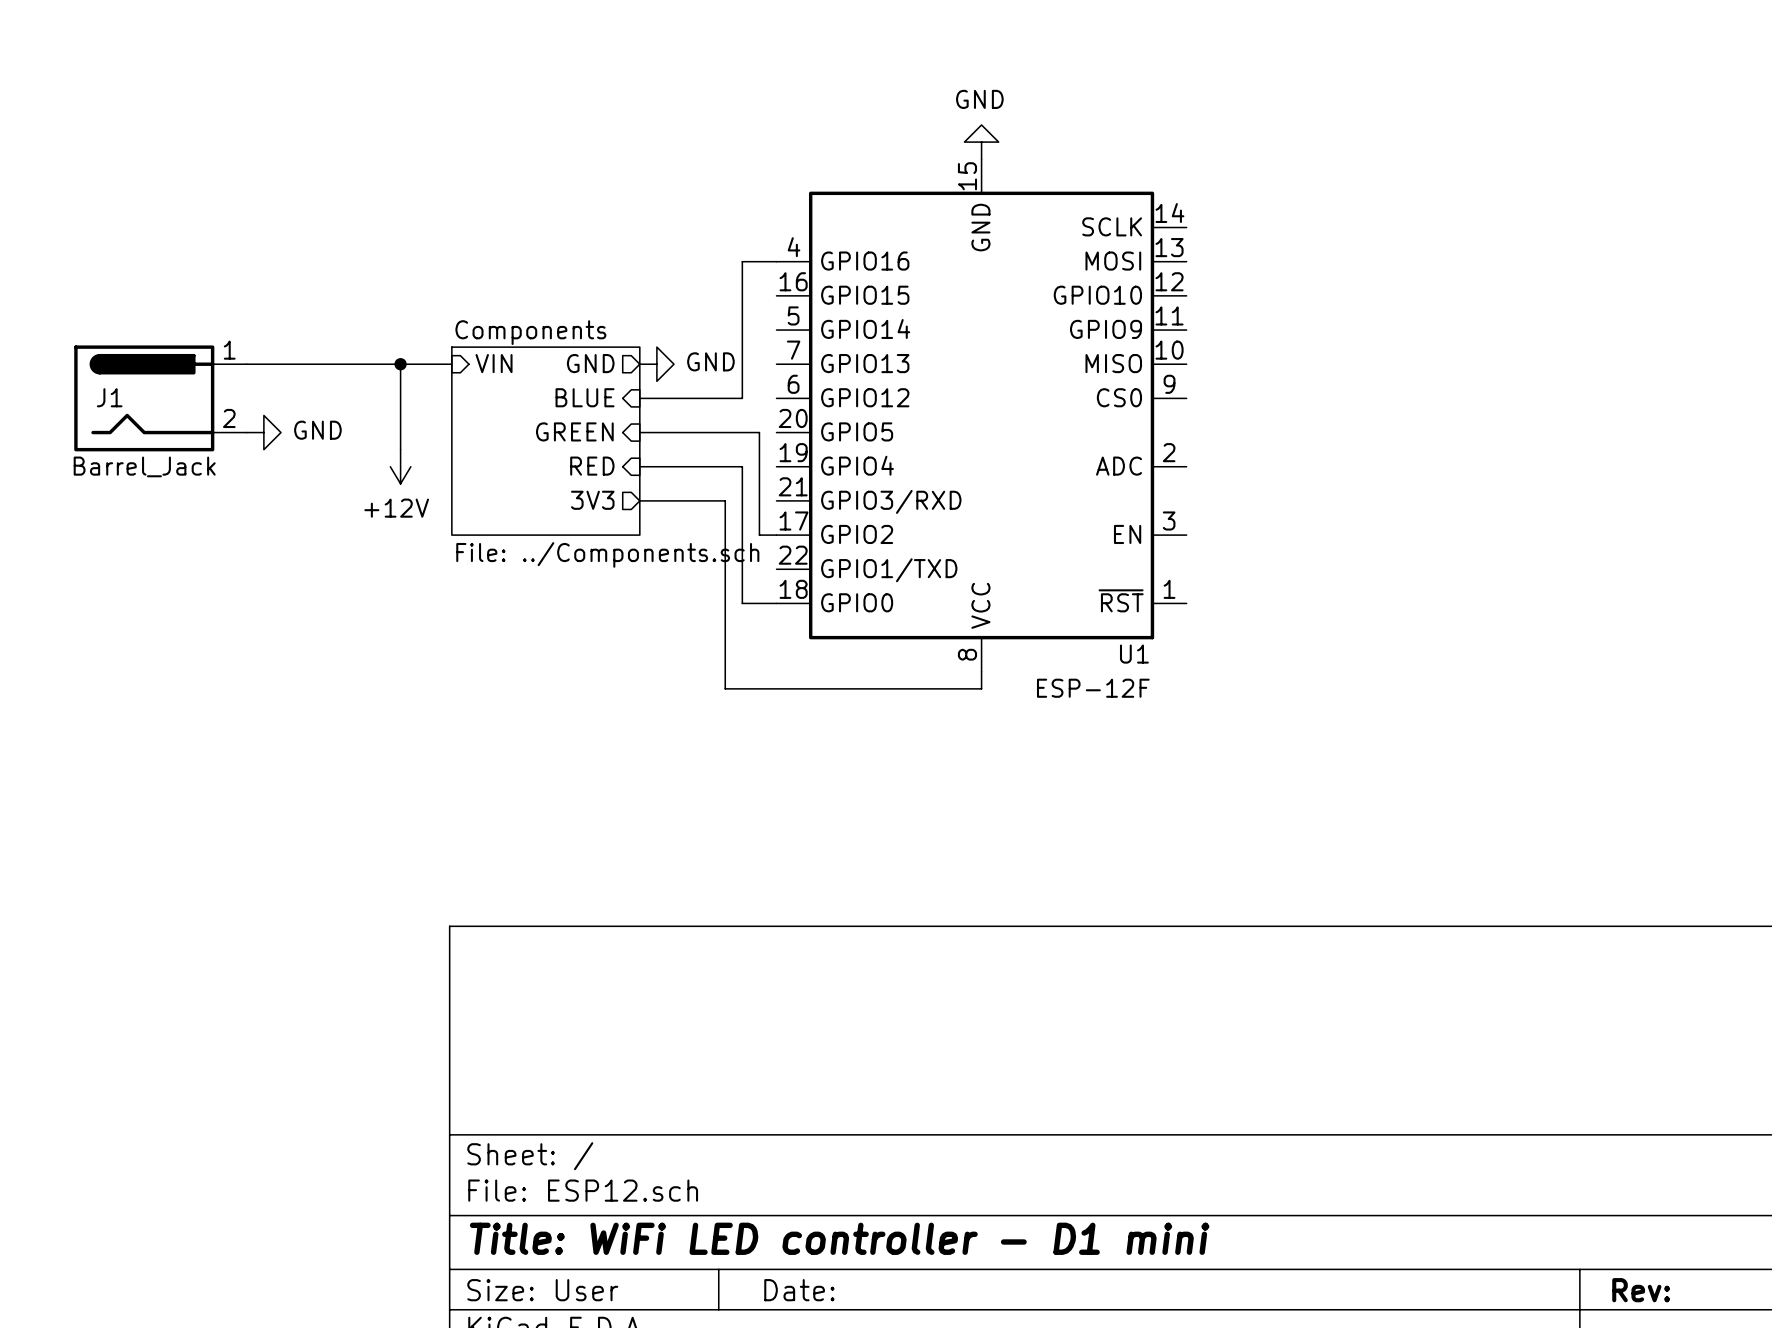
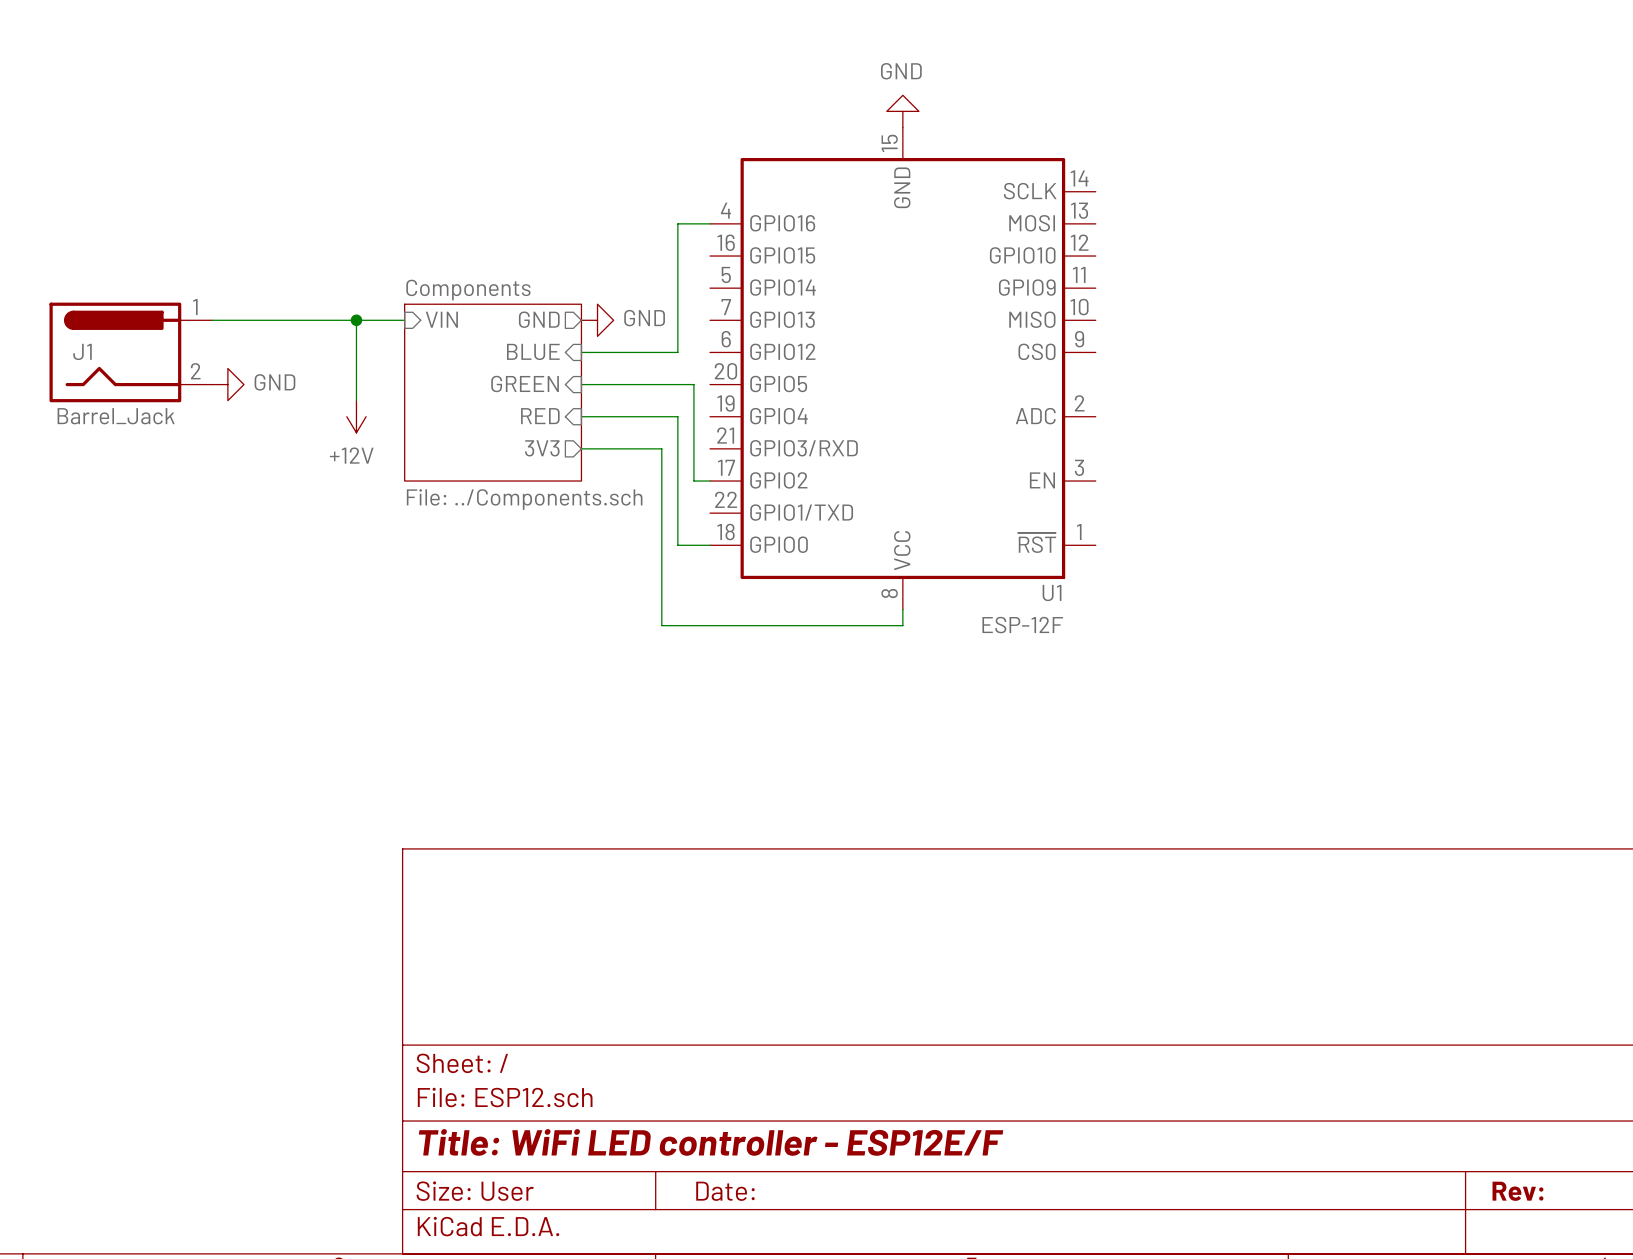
title block: Title: WiFi LED controller - D1 mini (839, 1238) -> Title: WiFi LED controller - ESP12E/F (711, 1142)

